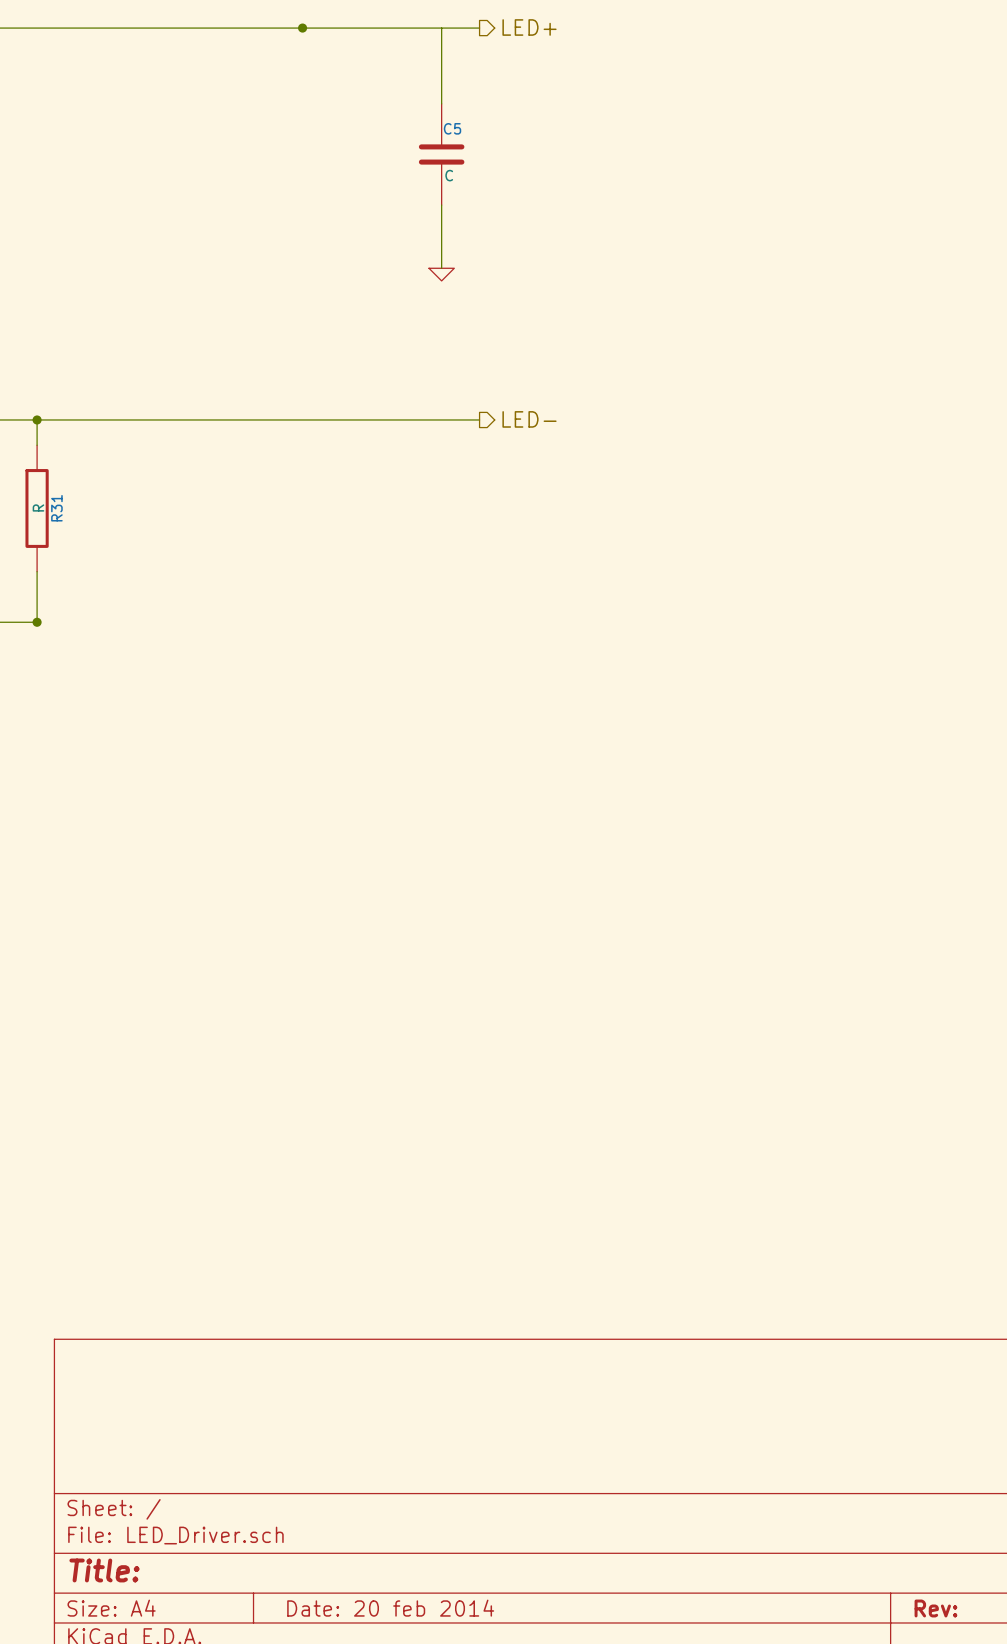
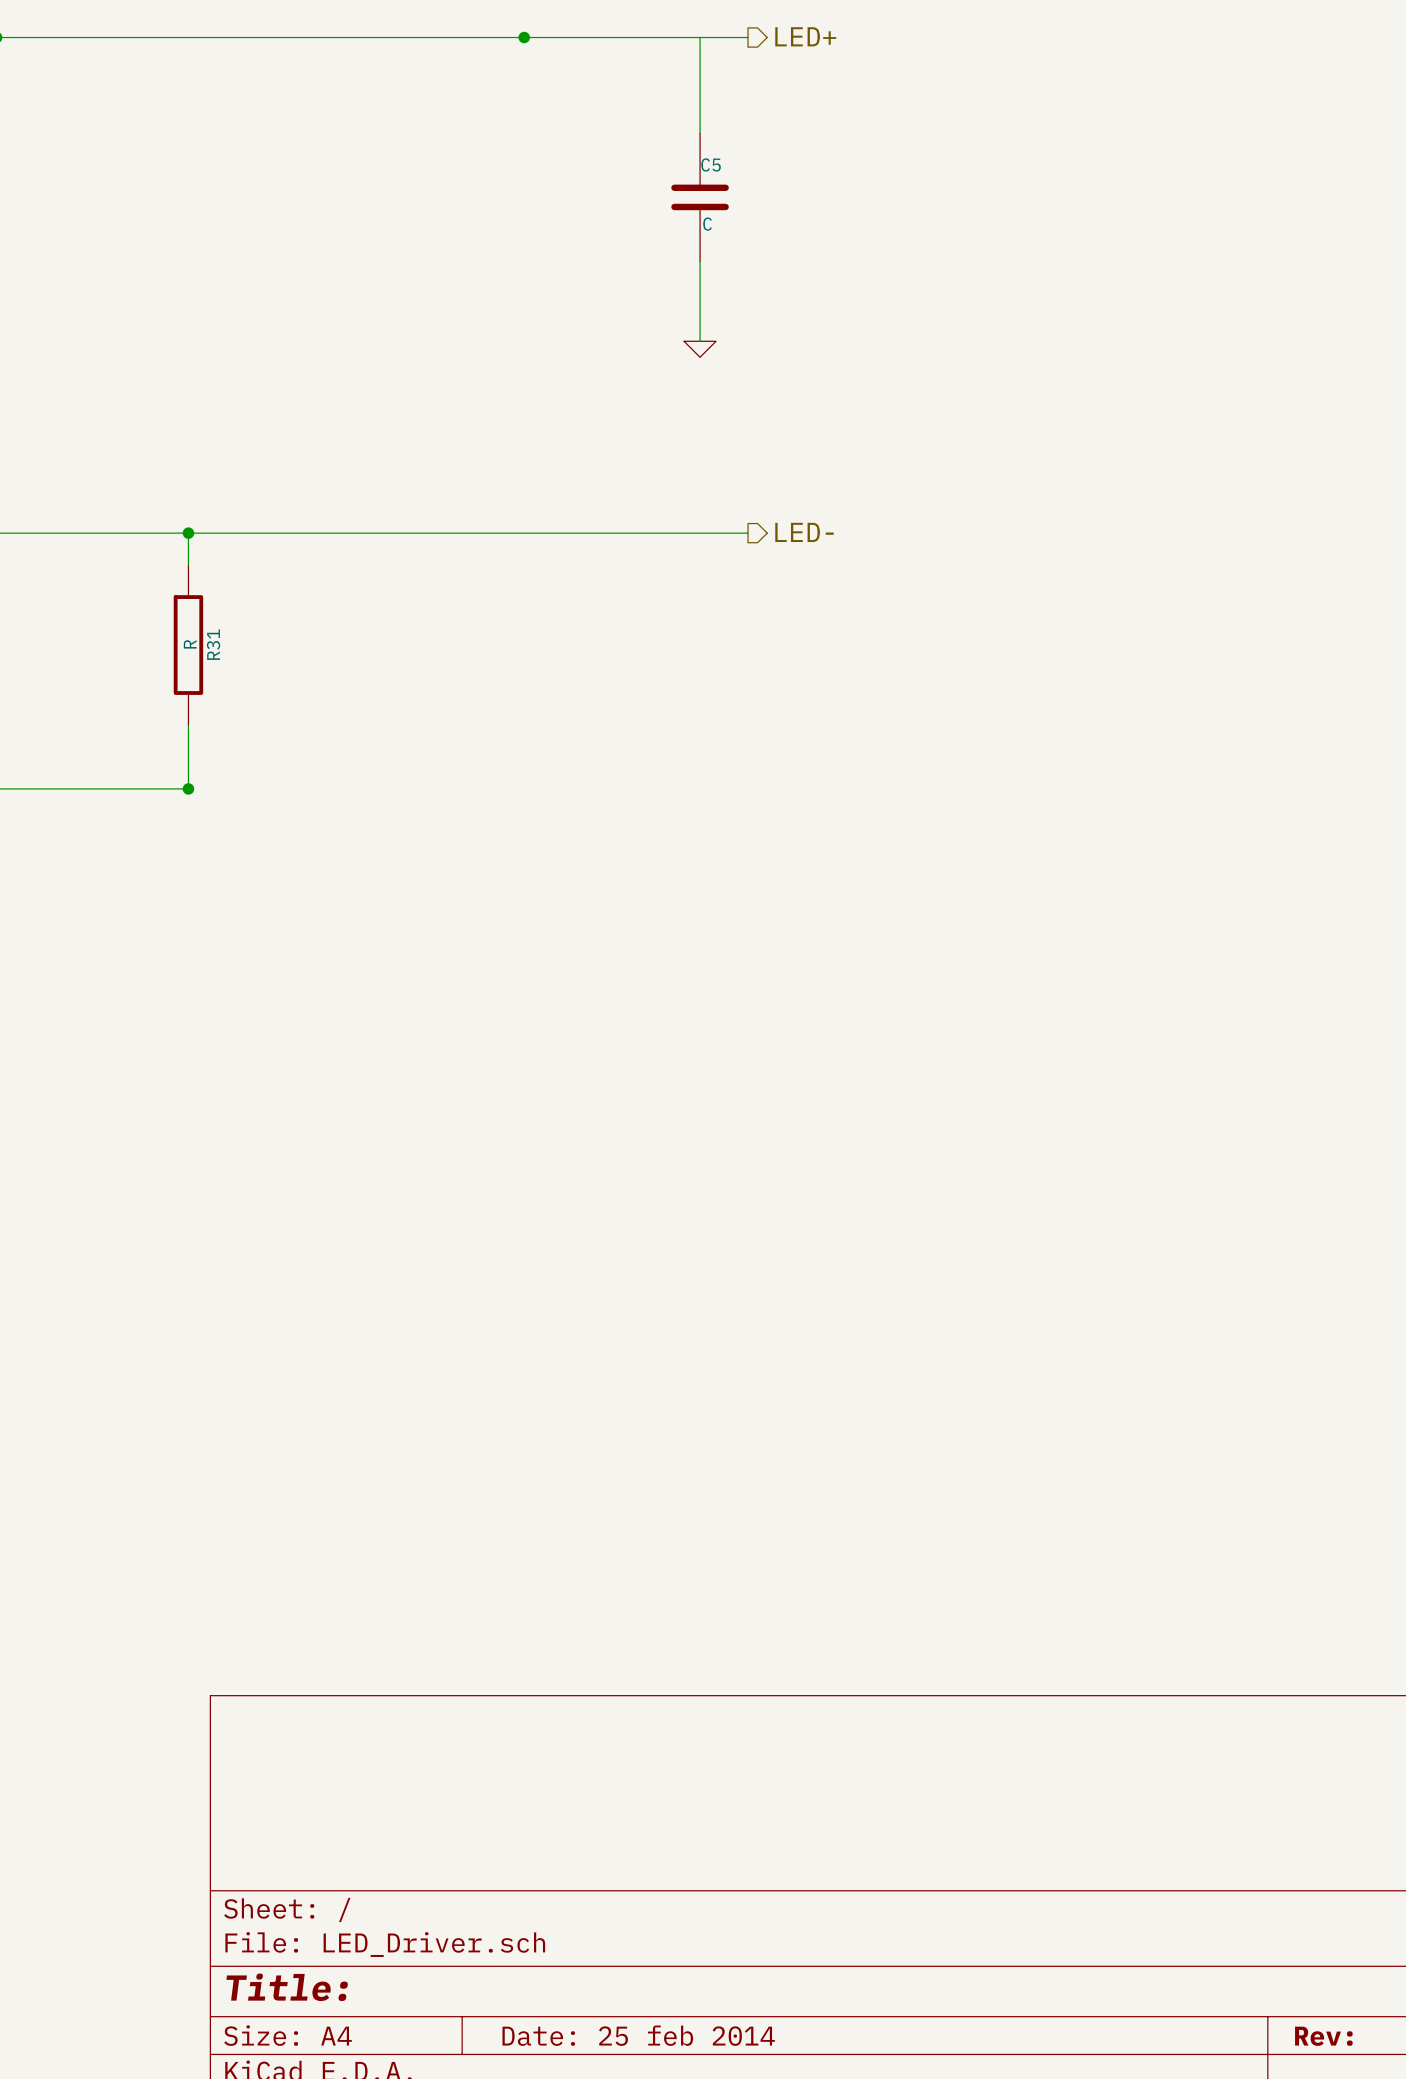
title block: Date: 20 feb 2014 (390, 1608) -> Date: 25 feb 2014 (638, 2035)

